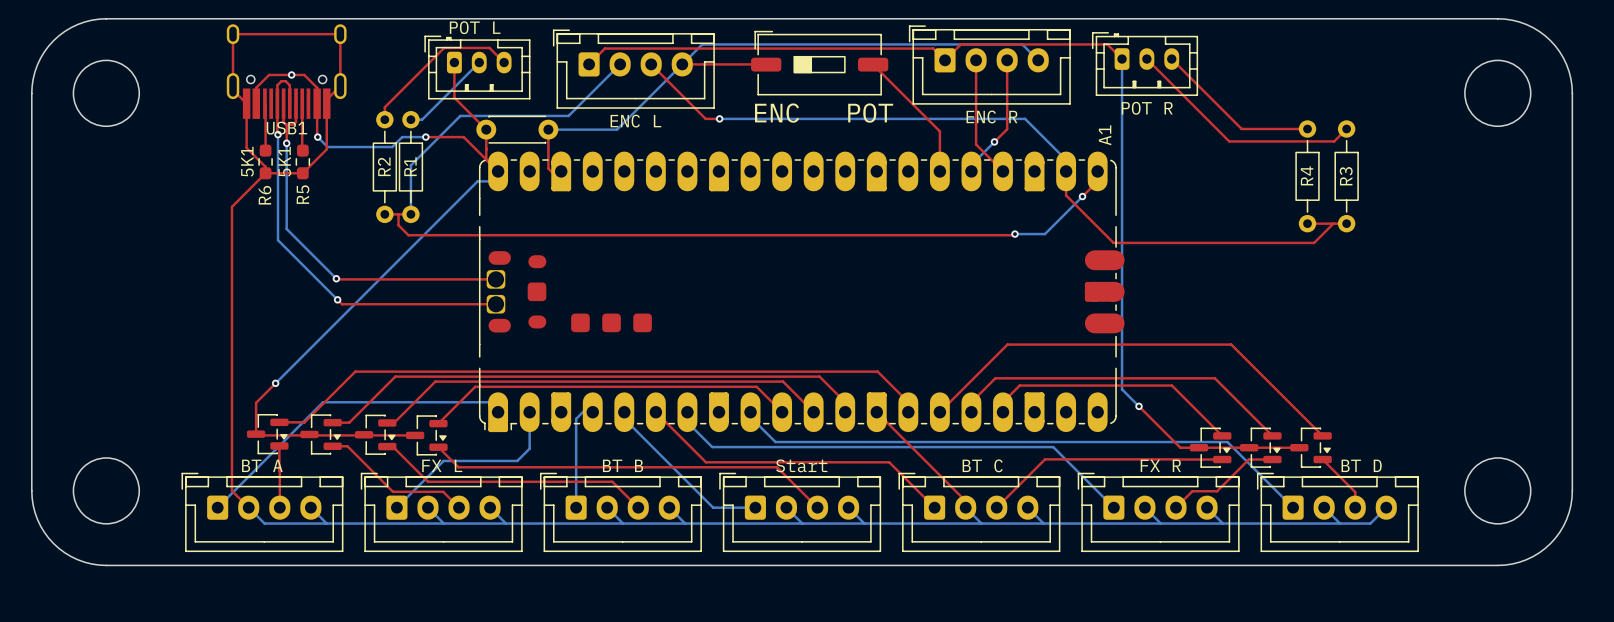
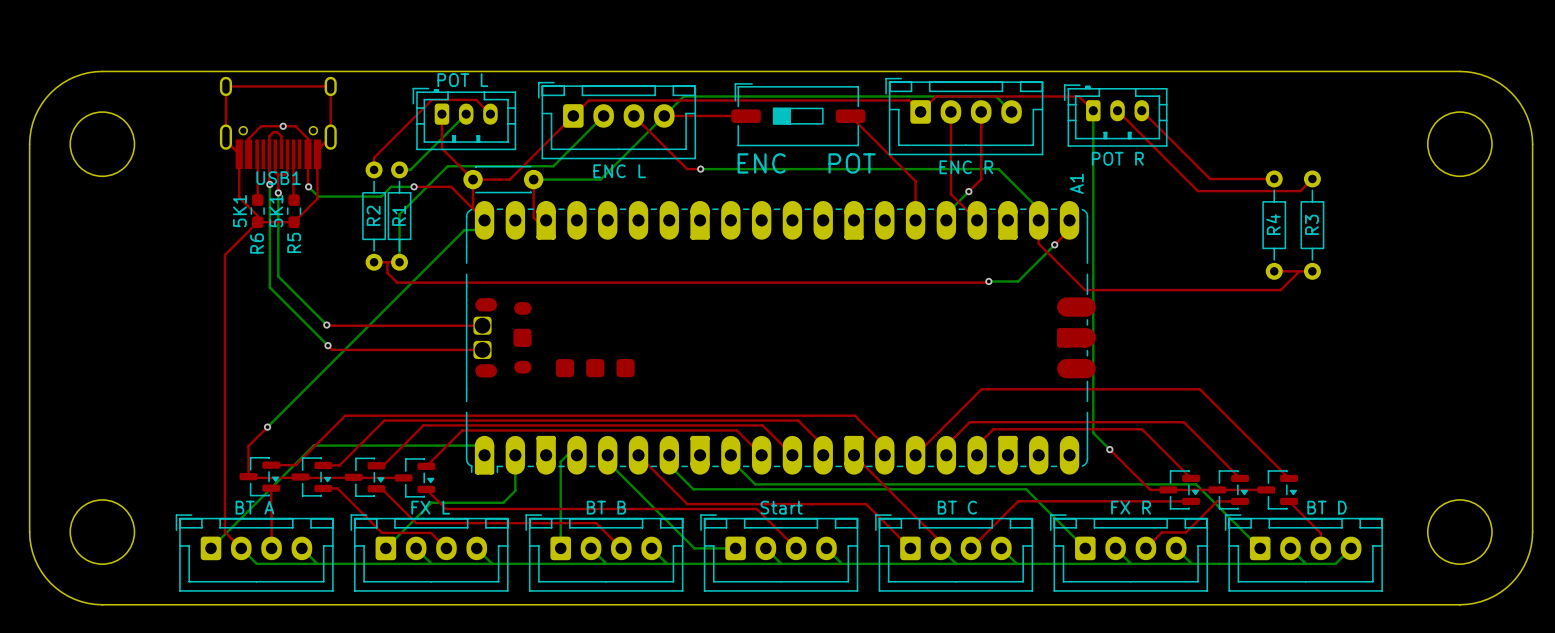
top track: none -> (573, 115) (509, 179) (473, 179)

